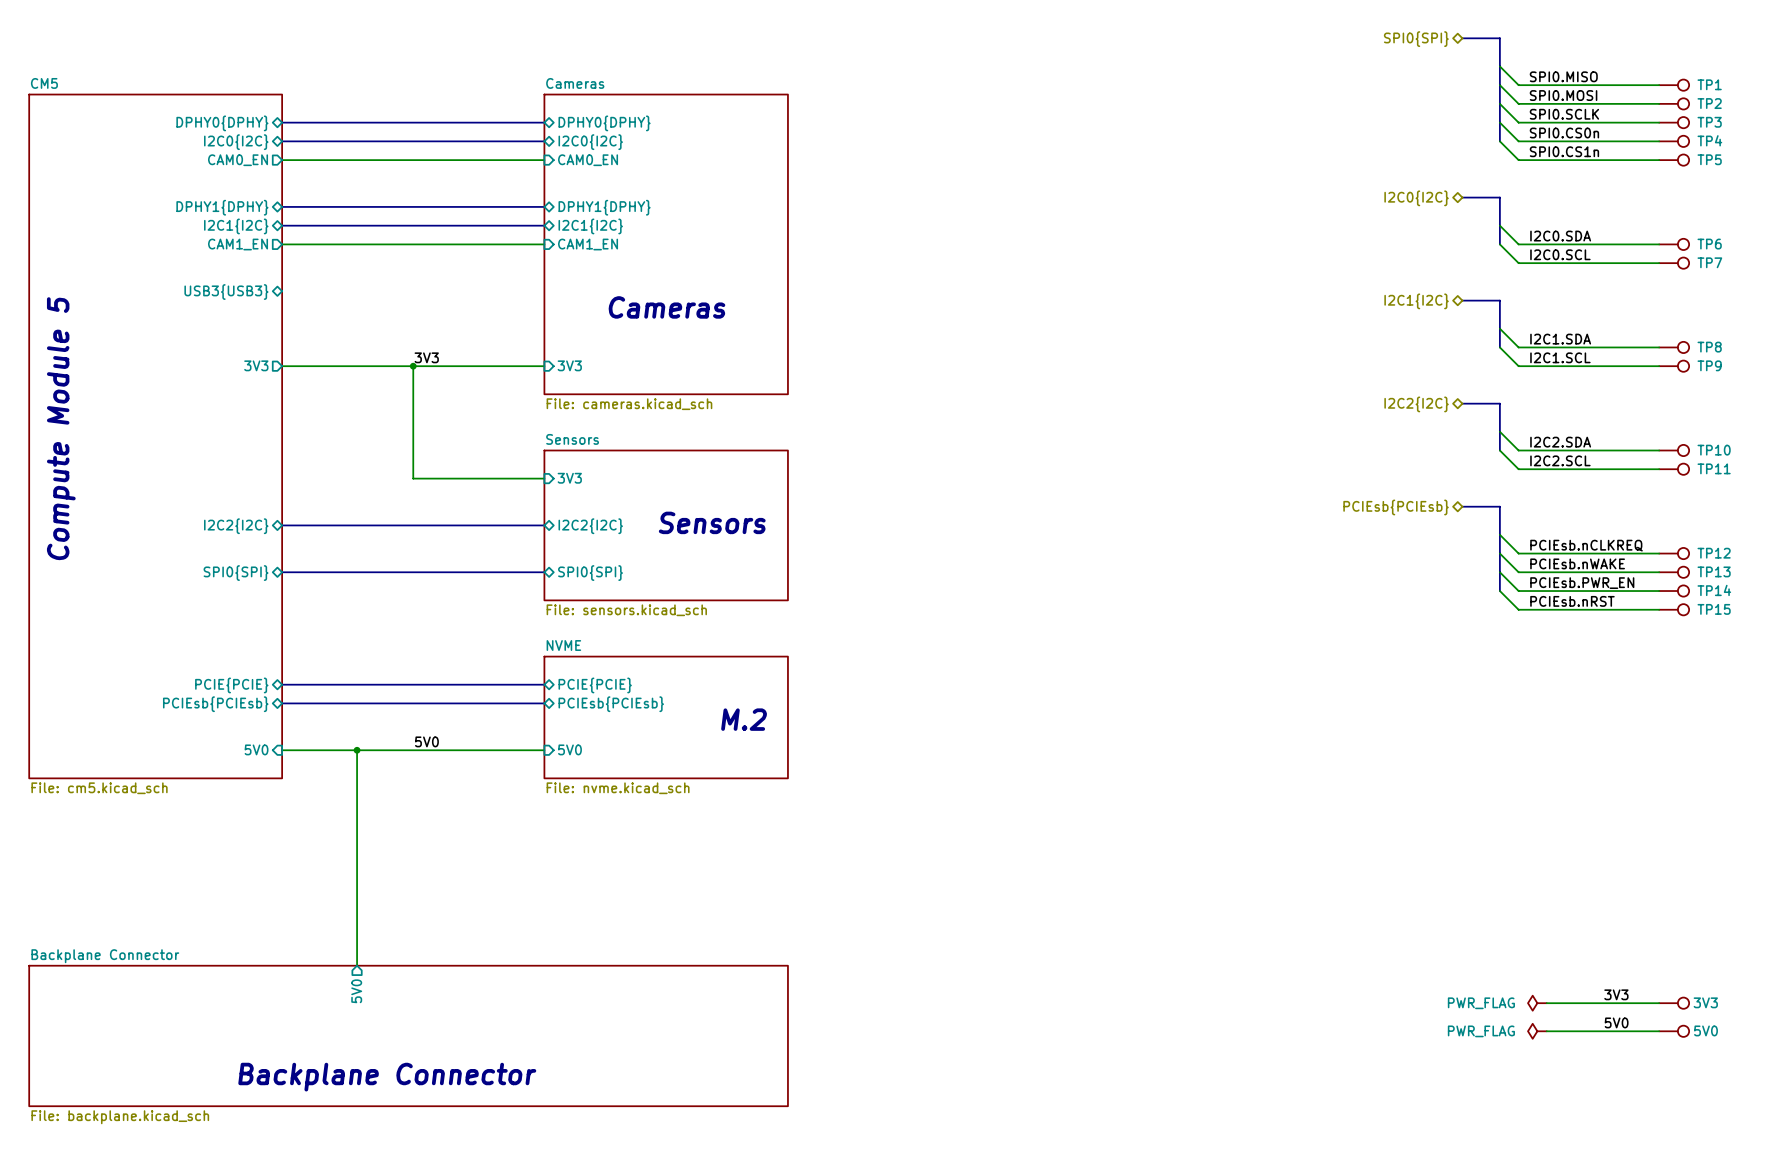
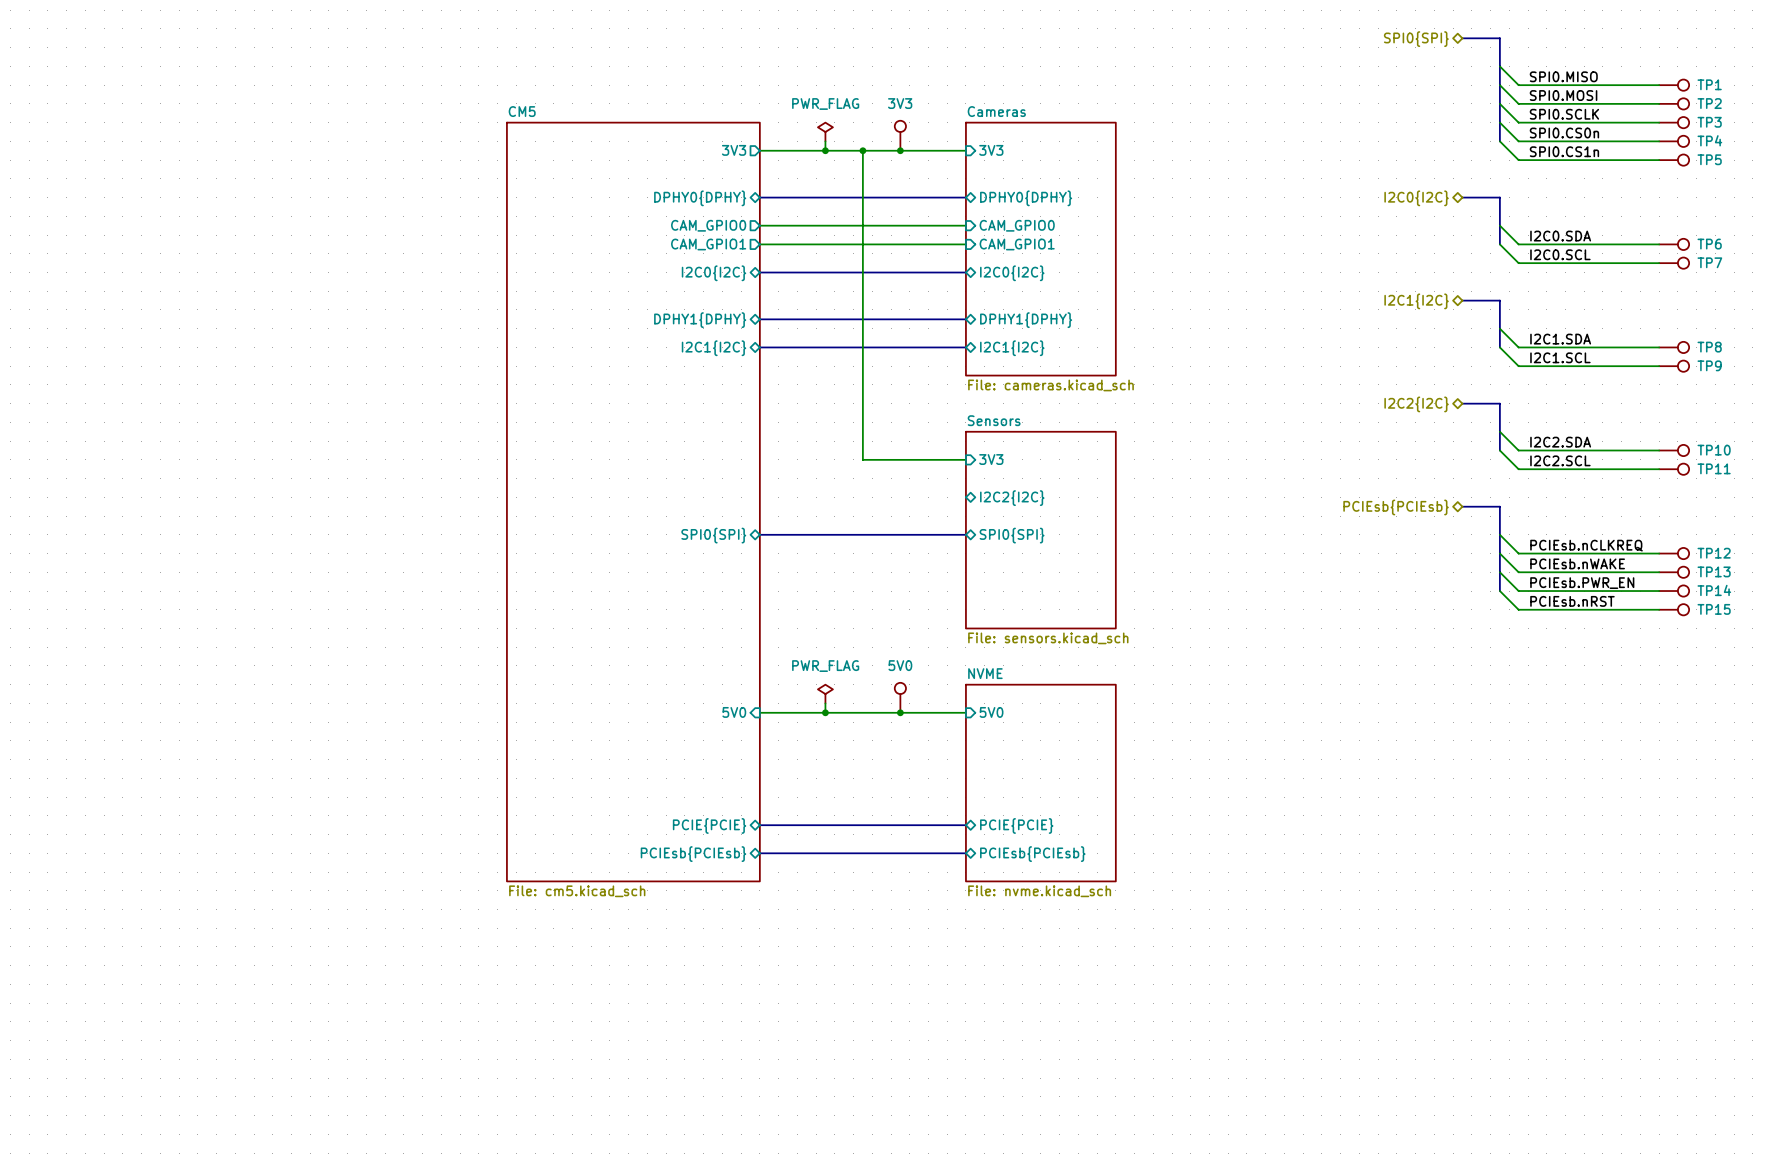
sheet CM5 name position: CM5 (44, 83) -> CM5 (522, 111)
sheet CM5 shape: [28, 93, 283, 779] -> [506, 122, 761, 882]
bus: (282, 122) (544, 122) -> none
sheet pin: DPHY0{DPHY} (222, 123) -> none
sheet pin: DPHY0{DPHY} (604, 123) -> none
power symbol: none -> PWR_FLAG (825, 132)
bus: (282, 141) (544, 141) -> none
wire: none -> (825, 141) (825, 150)
sheet pin: I2C0{I2C} (236, 142) -> none
sheet pin: I2C0{I2C} (590, 142) -> none
sheet pin: none -> 3V3 (734, 150)
wire: none -> (759, 150) (965, 150)
junction: none -> (825, 150)
wire: none -> (862, 150) (862, 459) (965, 459)
junction: none -> (862, 150)
junction: none -> (900, 150)
sheet pin: none -> 3V3 (991, 150)
sheet pin: CAM0_EN (238, 160) -> none
wire: (282, 160) (544, 160) -> none
sheet pin: CAM0_EN (588, 160) -> none
bus: none -> (759, 197) (965, 197)
sheet pin: none -> DPHY0{DPHY} (700, 198)
sheet pin: none -> DPHY0{DPHY} (1026, 198)
bus: (282, 206) (544, 206) -> none
sheet pin: DPHY1{DPHY} (222, 207) -> none
sheet pin: DPHY1{DPHY} (604, 207) -> none
bus: (282, 225) (544, 225) -> none
sheet pin: none -> CAM_GPIO0 (708, 225)
wire: none -> (759, 225) (965, 225)
sheet pin: none -> CAM_GPIO0 (1017, 225)
sheet pin: I2C1{I2C} (236, 226) -> none
sheet pin: I2C1{I2C} (590, 226) -> none
sheet pin: CAM1_EN (238, 244) -> none
wire: (282, 244) (544, 244) -> none
sheet pin: CAM1_EN (588, 244) -> none
sheet Cameras: File: cameras.kicad_sch (666, 244) -> none
sheet pin: none -> CAM_GPIO1 (708, 244)
wire: none -> (759, 244) (965, 244)
sheet pin: none -> CAM_GPIO1 (1017, 244)
sheet Cameras: none -> File: cameras.kicad_sch (1040, 249)
bus: none -> (759, 272) (965, 272)
sheet pin: none -> I2C0{I2C} (713, 273)
sheet pin: none -> I2C0{I2C} (1012, 273)
sheet pin: USB3{USB3} (226, 292) -> none
text: Cameras (666, 307) -> none
bus: none -> (759, 319) (965, 319)
sheet pin: none -> DPHY1{DPHY} (700, 320)
sheet pin: none -> DPHY1{DPHY} (1026, 320)
bus: none -> (759, 347) (965, 347)
sheet pin: none -> I2C1{I2C} (713, 348)
sheet pin: none -> I2C1{I2C} (1012, 348)
label: 3V3 (426, 357) -> none
sheet pin: 3V3 (256, 365) -> none
sheet pin: 3V3 (569, 365) -> none
wire: (282, 366) (544, 366) -> none
wire: (413, 366) (413, 478) (544, 478) -> none
junction: (413, 366) -> none
text: Compute Module 5 (61, 428) -> none
sheet pin: none -> 3V3 (991, 459)
sheet pin: 3V3 (569, 478) -> none
sheet pin: none -> I2C2{I2C} (1012, 498)
text: Sensors (712, 522) -> none
bus: (282, 525) (544, 525) -> none
sheet Sensors: File: sensors.kicad_sch (666, 525) -> none
sheet pin: I2C2{I2C} (236, 526) -> none
sheet pin: I2C2{I2C} (590, 526) -> none
sheet Sensors: none -> File: sensors.kicad_sch (1040, 530)
bus: none -> (759, 534) (965, 534)
sheet pin: none -> SPI0{SPI} (713, 535)
sheet pin: none -> SPI0{SPI} (1012, 535)
bus: (282, 572) (544, 572) -> none
sheet pin: SPI0{SPI} (236, 573) -> none
sheet pin: SPI0{SPI} (590, 573) -> none
bus: (282, 684) (544, 684) -> none
sheet pin: PCIE{PCIE} (231, 685) -> none
sheet pin: PCIE{PCIE} (595, 685) -> none
power symbol: none -> PWR_FLAG (825, 694)
bus: (282, 703) (544, 703) -> none
wire: none -> (825, 703) (825, 712)
sheet pin: PCIEsb{PCIEsb} (215, 704) -> none
sheet pin: PCIEsb{PCIEsb} (611, 704) -> none
sheet pin: none -> 5V0 (734, 712)
wire: none -> (759, 712) (965, 712)
junction: none -> (825, 712)
junction: none -> (900, 712)
sheet pin: none -> 5V0 (991, 712)
sheet NVME: File: nvme.kicad_sch (666, 717) -> none
text: M.2 (744, 719) -> none
label: 5V0 (426, 741) -> none
sheet pin: 5V0 (256, 749) -> none
sheet pin: 5V0 (569, 749) -> none
wire: (282, 750) (544, 750) -> none
wire: (357, 750) (357, 965) -> none
junction: (357, 750) -> none
sheet NVME: none -> File: nvme.kicad_sch (1040, 783)
sheet CM5 value position: File: cm5.kicad_sch (99, 788) -> File: cm5.kicad_sch (577, 891)
sheet pin: none -> PCIE{PCIE} (709, 825)
bus: none -> (759, 825) (965, 825)
sheet pin: none -> PCIE{PCIE} (1016, 825)
bus: none -> (759, 853) (965, 853)
sheet pin: none -> PCIEsb{PCIEsb} (693, 854)
sheet pin: none -> PCIEsb{PCIEsb} (1032, 854)
sheet pin: 5V0 (356, 991) -> none
label: 3V3 (1616, 994) -> none
power symbol: PWR_FLAG (1537, 1003) -> none
wire: (1546, 1003) (1659, 1003) -> none
3V3 position: (1674, 1003) -> (900, 135)
3V3 rotation: 0° (1683, 1003) -> 90° counterclockwise (900, 126)
label: 5V0 (1616, 1022) -> none
power symbol: PWR_FLAG (1537, 1031) -> none
wire: (1546, 1031) (1659, 1031) -> none
5V0 position: (1674, 1031) -> (900, 697)
5V0 rotation: 0° (1683, 1031) -> 90° counterclockwise (900, 688)
sheet Backplane Connector: File: backplane.kicad_sch (408, 1035) -> none
text: Backplane Connector (387, 1077) -> none

